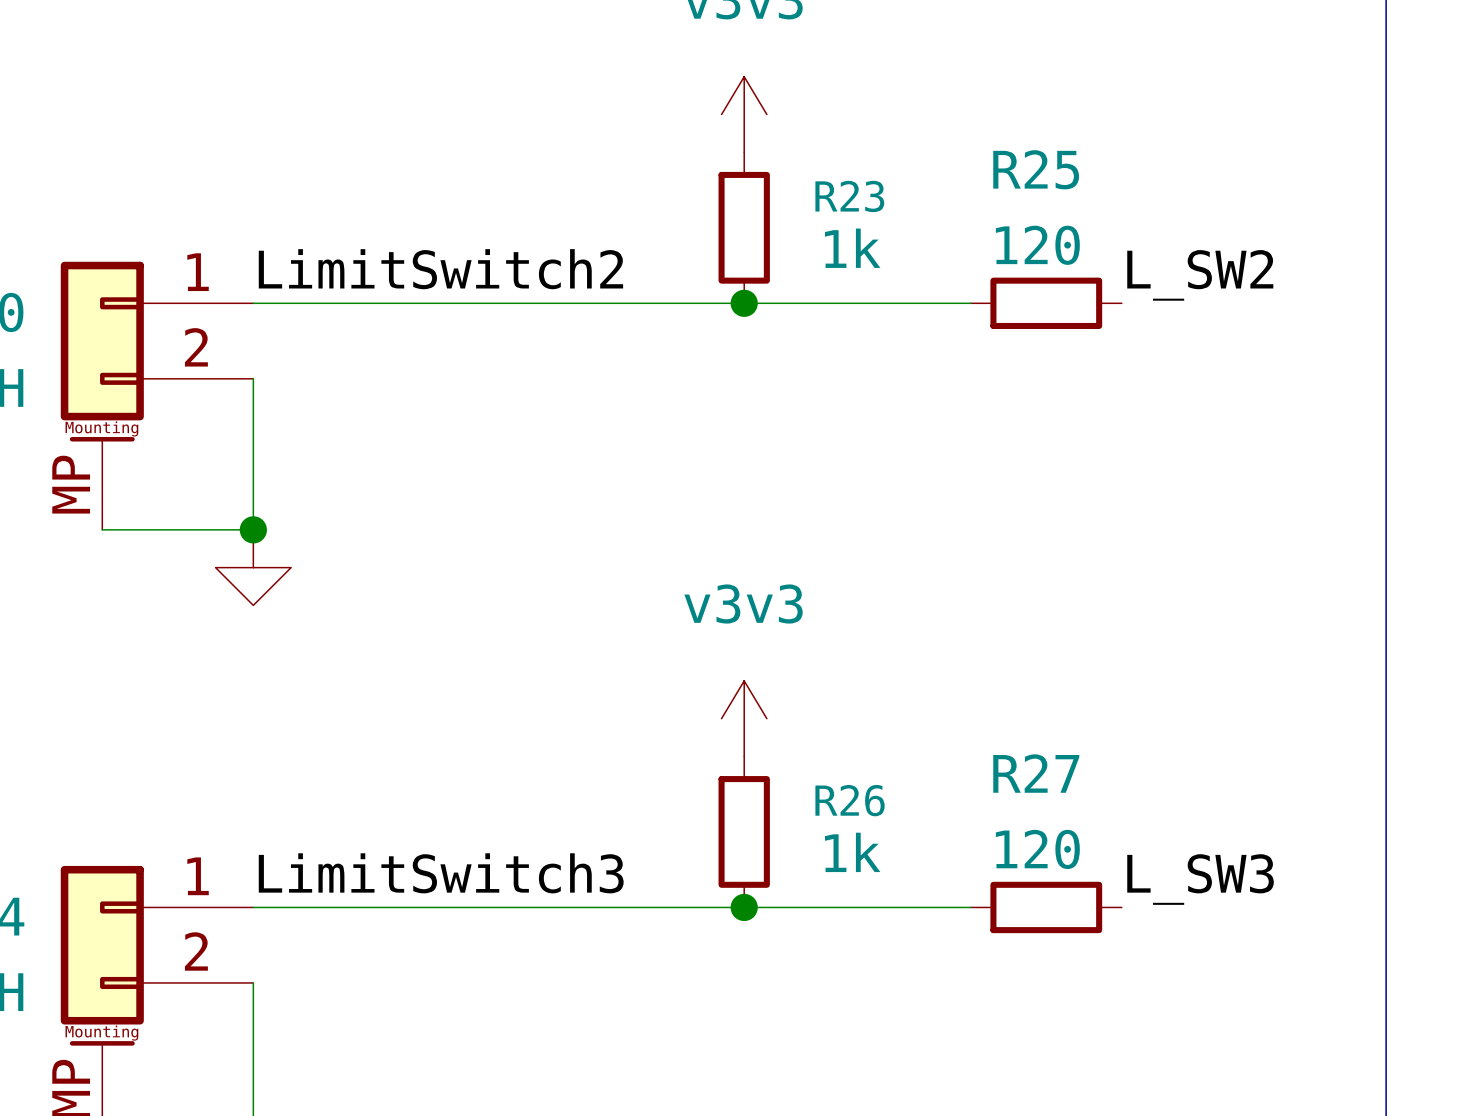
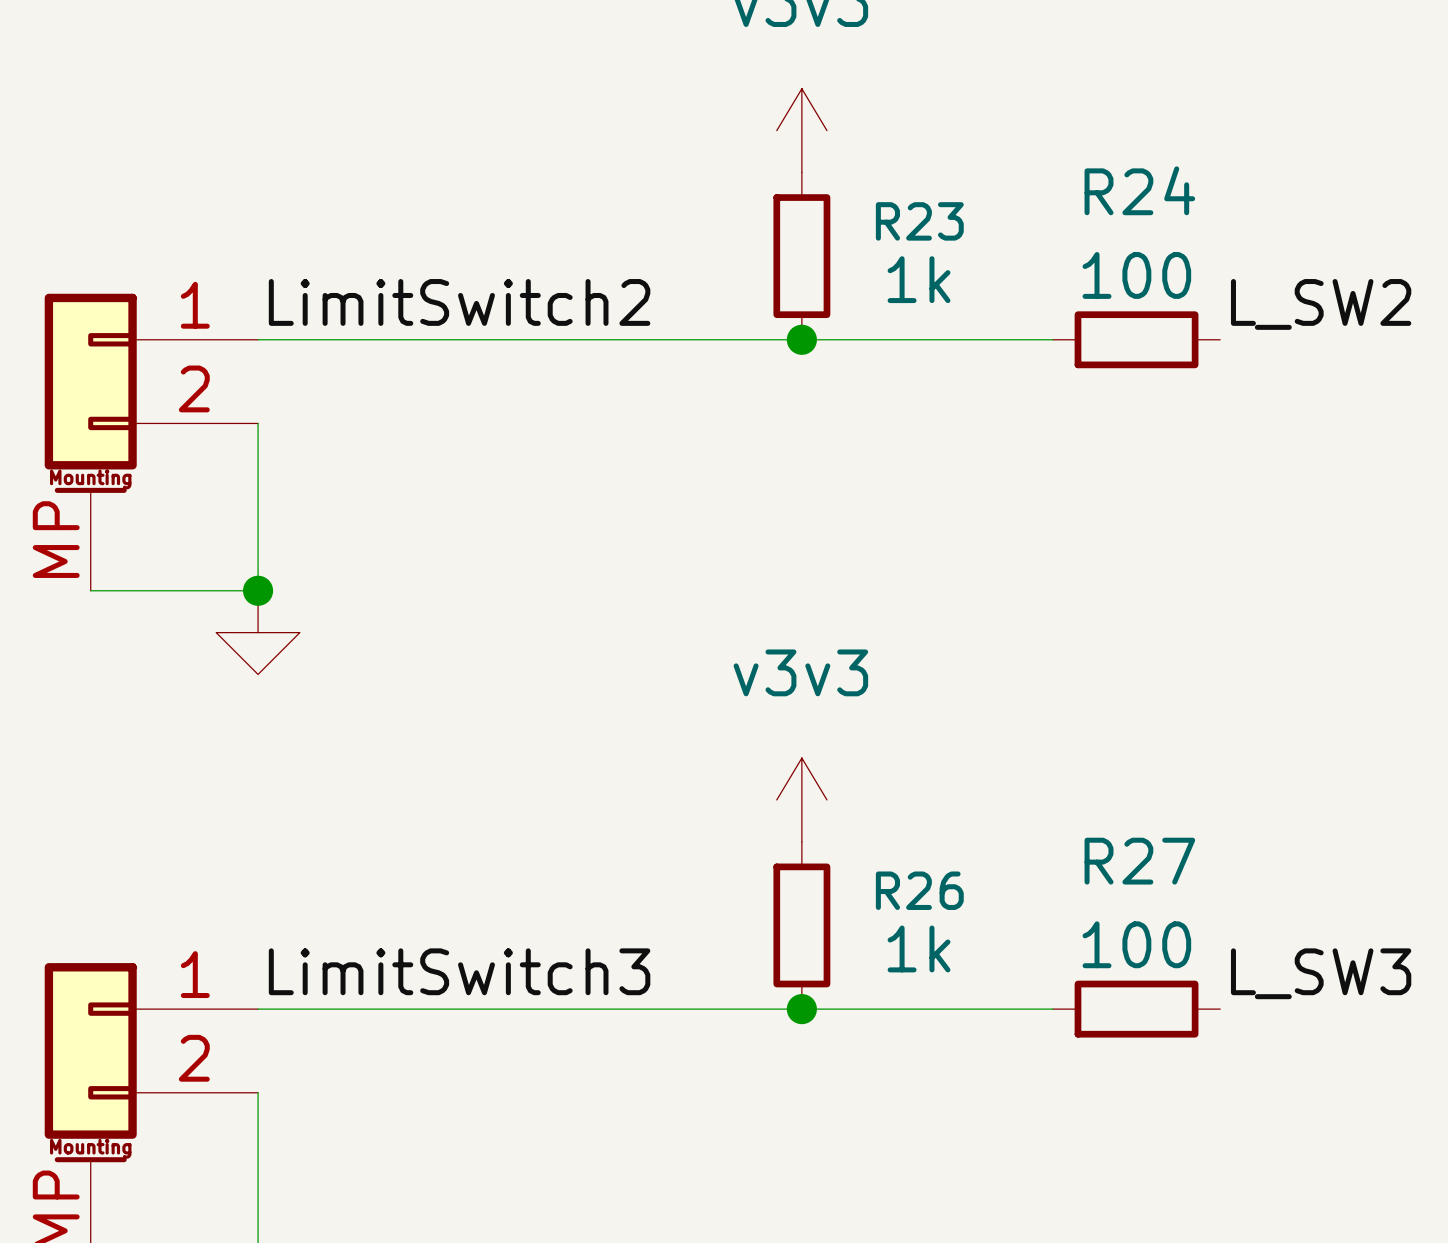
R25 name: R25 (1036, 169) -> R24 (1139, 190)
R25 value: 120 (1037, 245) -> 100 (1136, 275)
R27 value: 120 (1037, 849) -> 100 (1136, 944)

